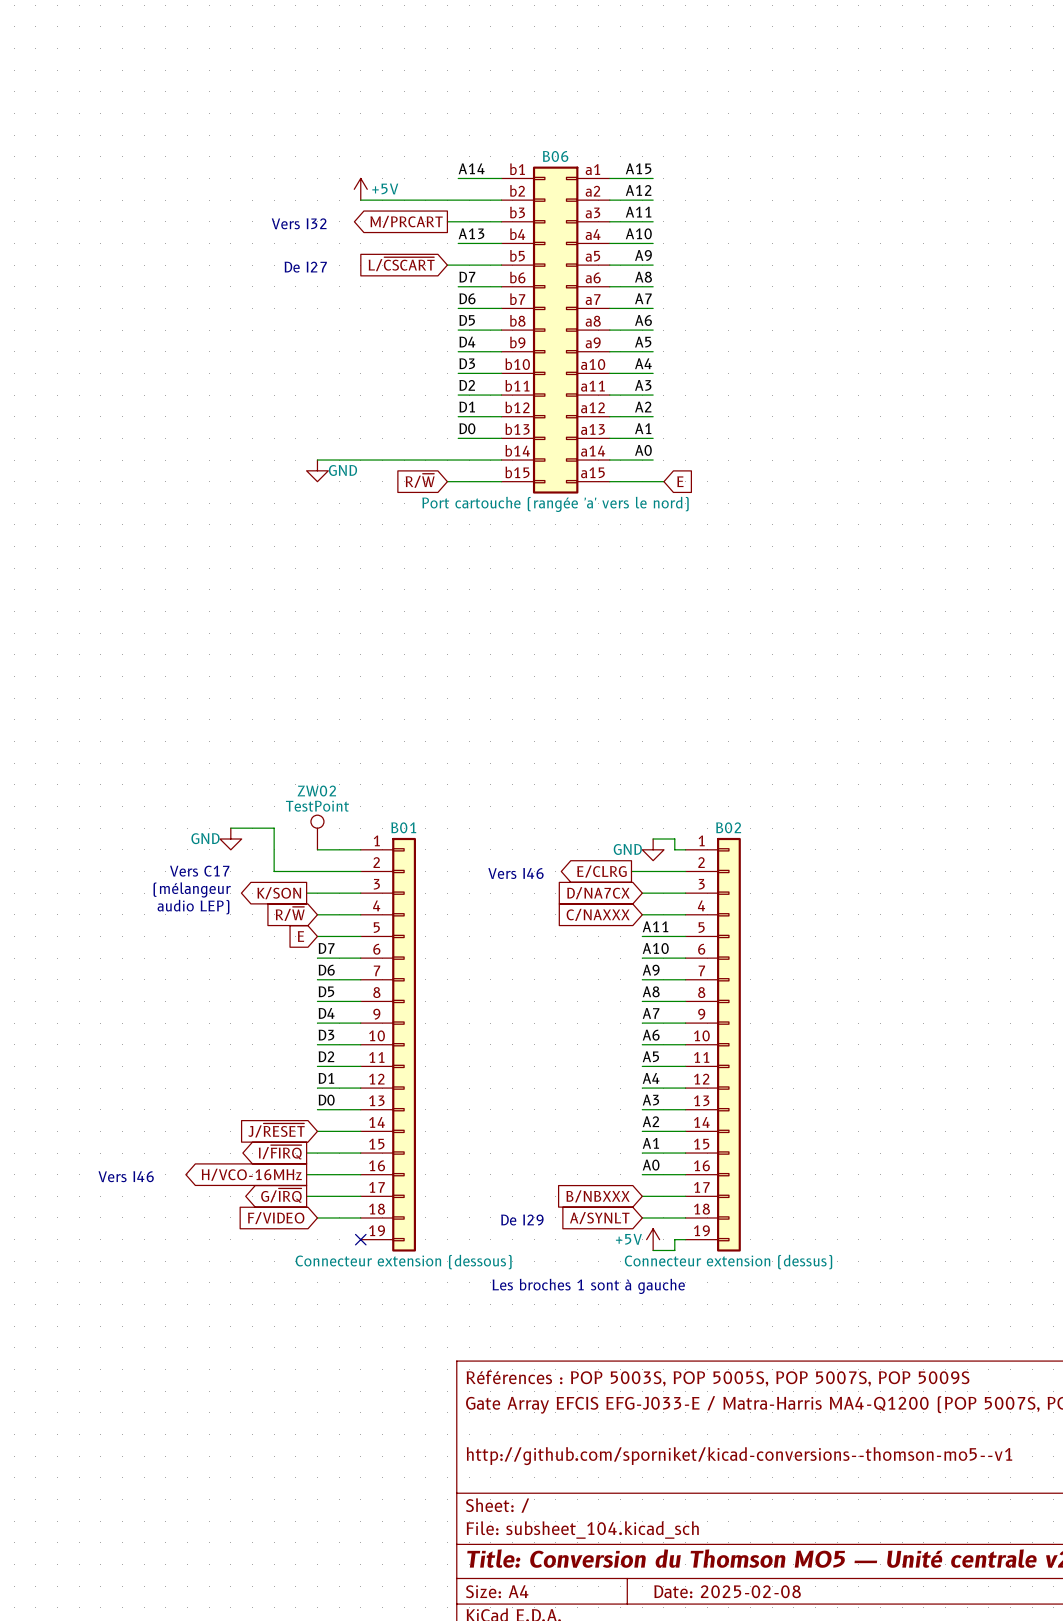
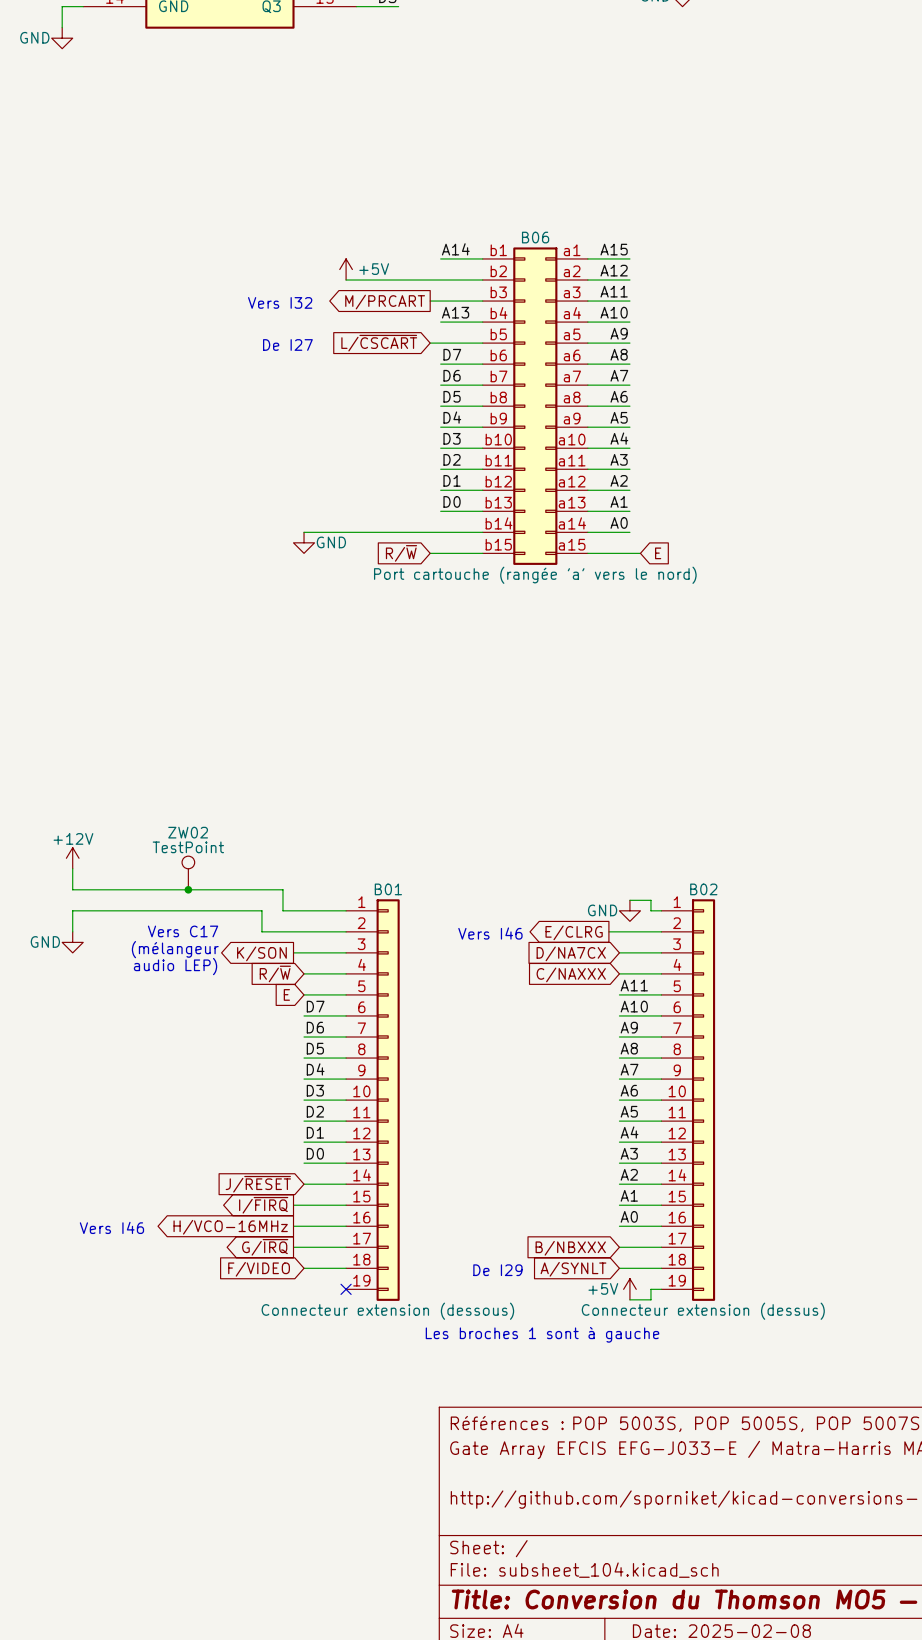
power symbol: none -> +12V (72, 858)
wire: none -> (72, 868) (72, 889) (219, 889)
junction: none -> (188, 889)
wire: (274, 828) (274, 849) -> (261, 889) (282, 889) (282, 910) (304, 910)
ZW02 position: (317, 832) -> (188, 872)
power symbol position: GND (230, 839) -> GND (72, 942)
wire: none -> (261, 910) (72, 910) (72, 931)

